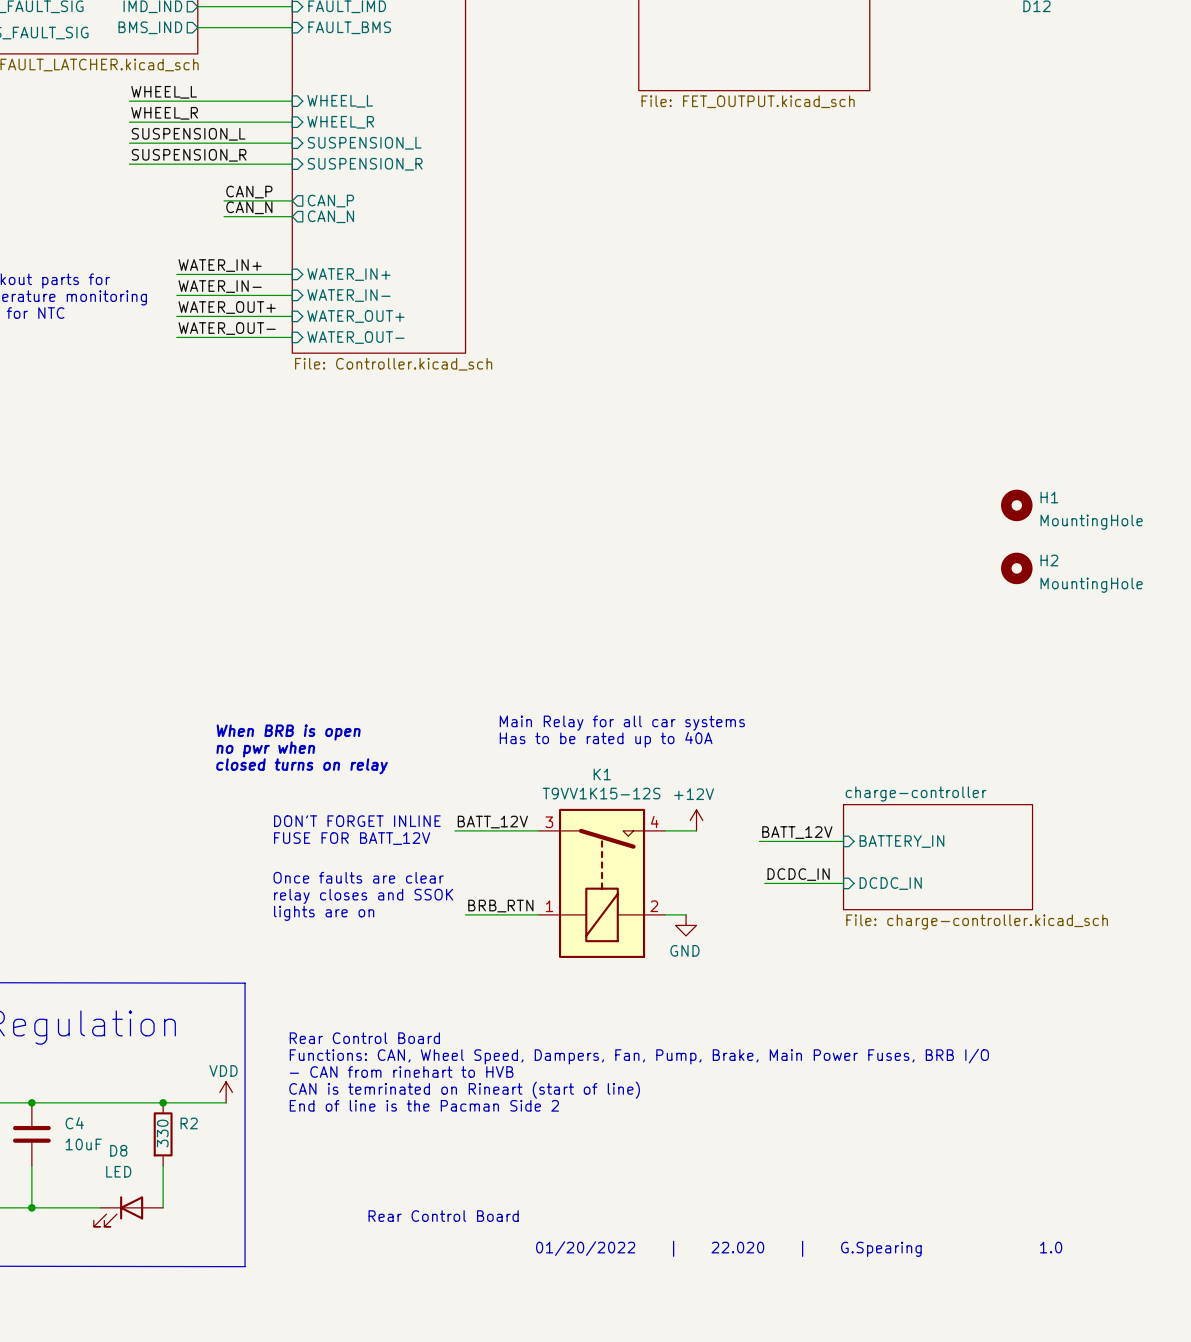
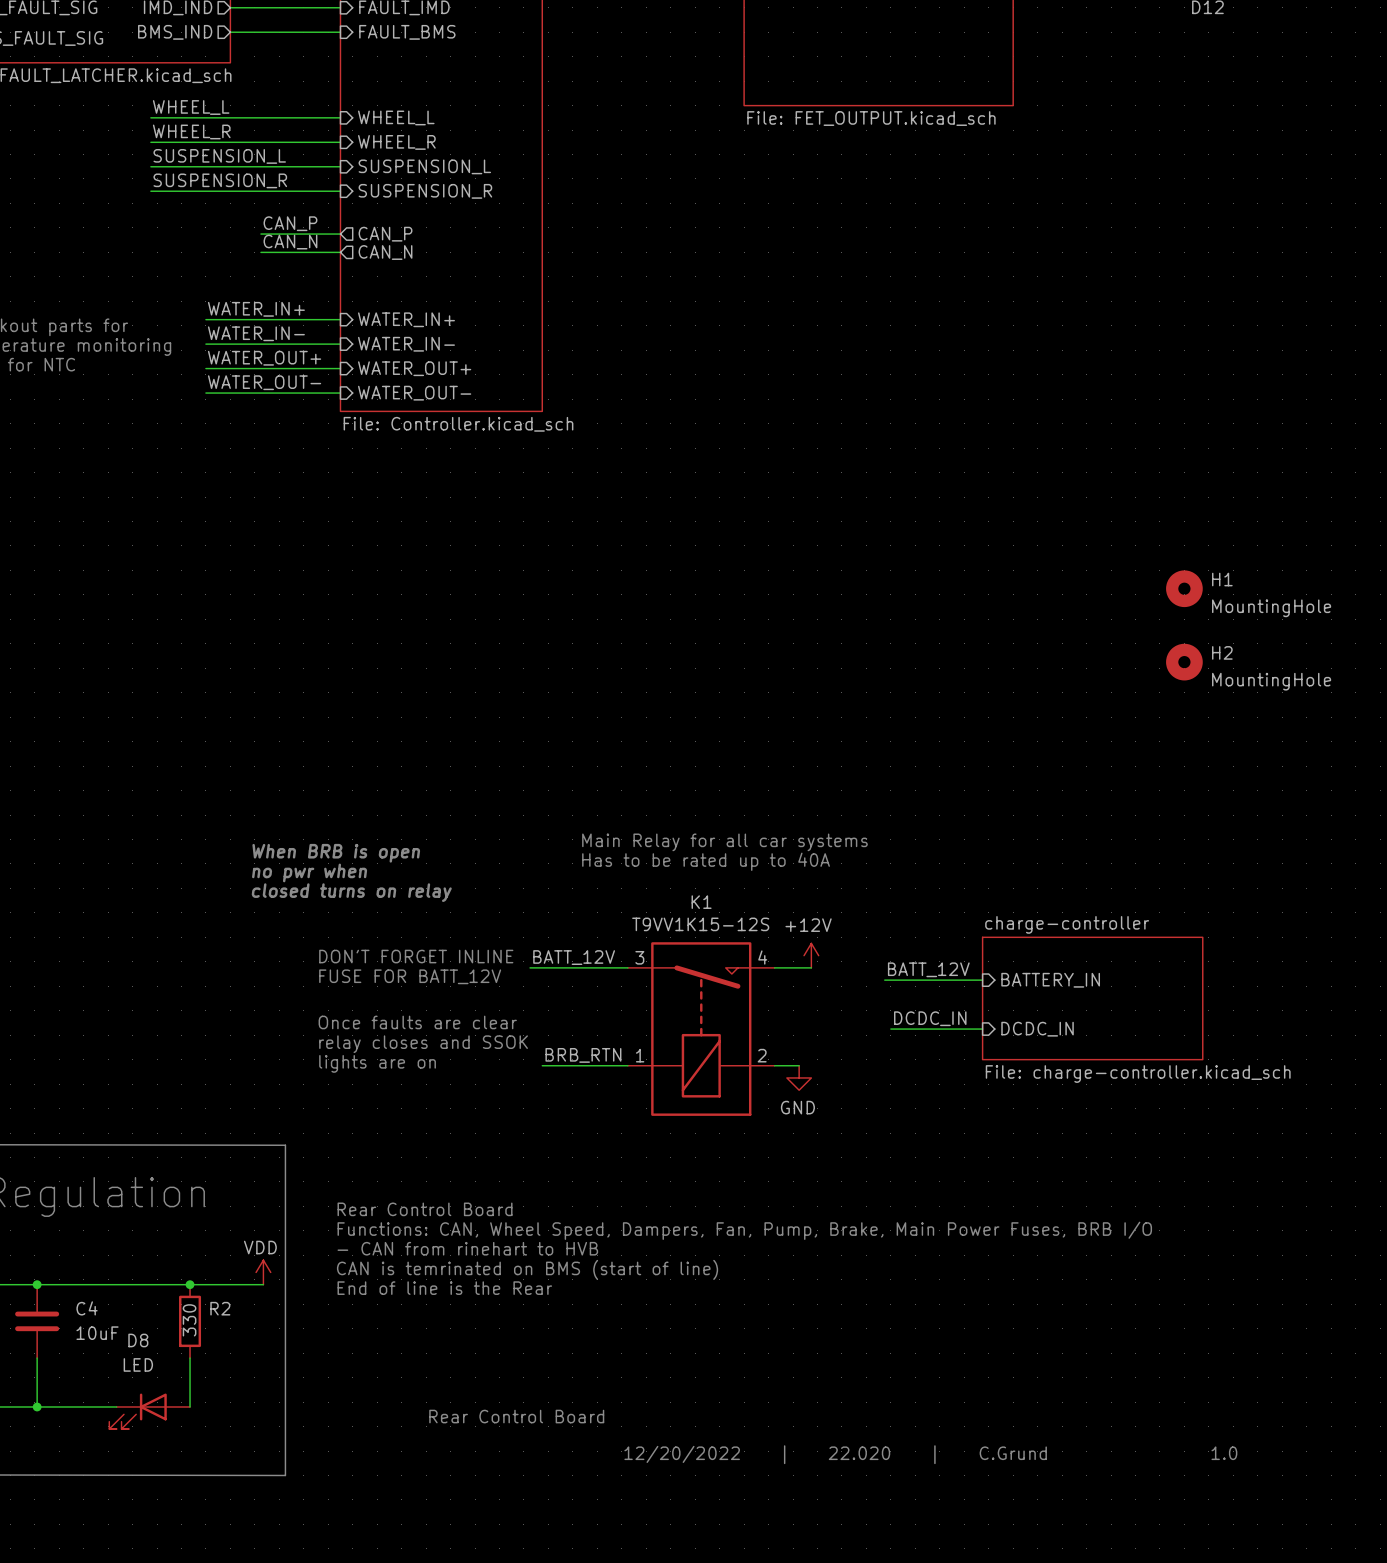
text: CAN is temrinated on Rineart (start of line) (464, 1090) -> CAN is temrinated on BMS (start of line) (527, 1269)
text: End of line is the Pacman Side 2 (424, 1105) -> End of line is the Rear (444, 1288)
text: 01/20/2022 | 22.020 | G.Spearing (728, 1248) -> 12/20/2022 | 22.020 | C.Grund (835, 1454)

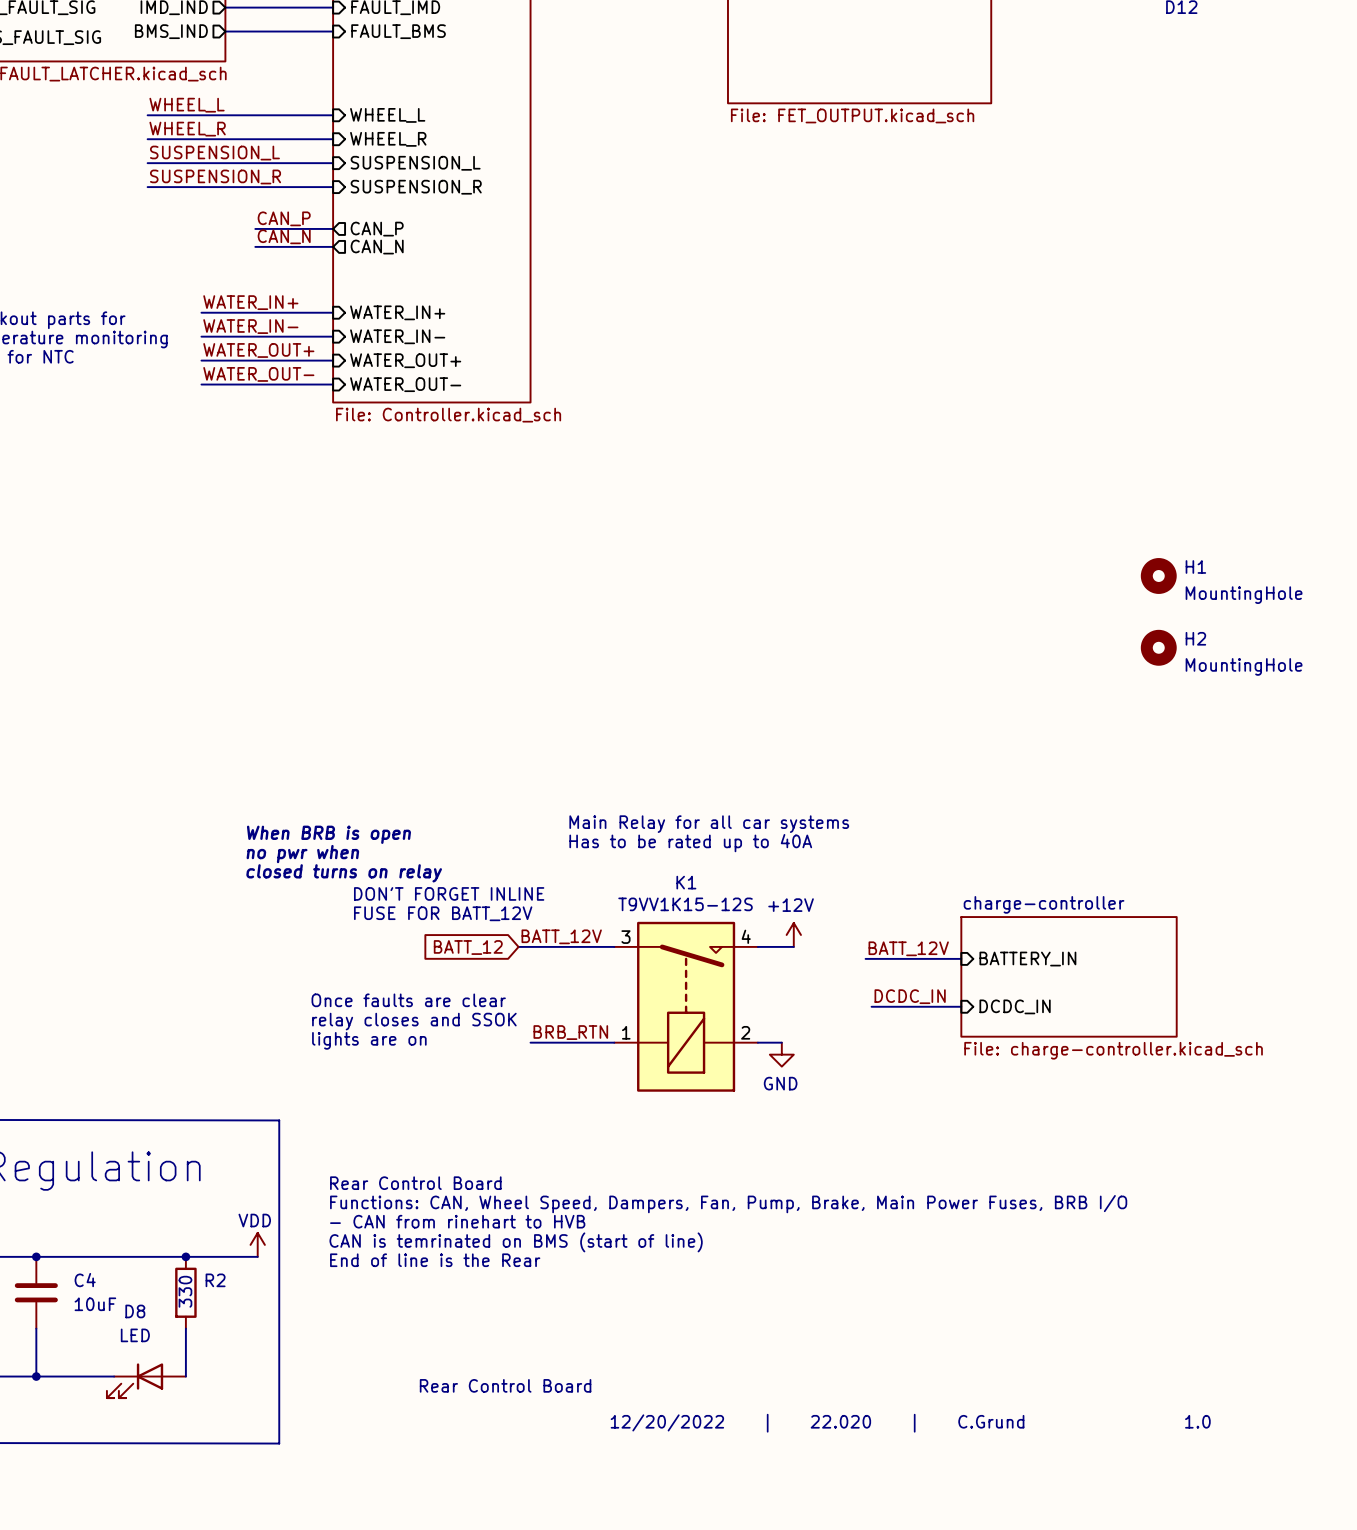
text position: DON'T FORGET INLINE (416, 956) -> DON'T FORGET INLINE (449, 893)
global label: none -> BATT_12 (468, 947)
text position: FUSE FOR BATT_12V (410, 976) -> FUSE FOR BATT_12V (443, 913)

